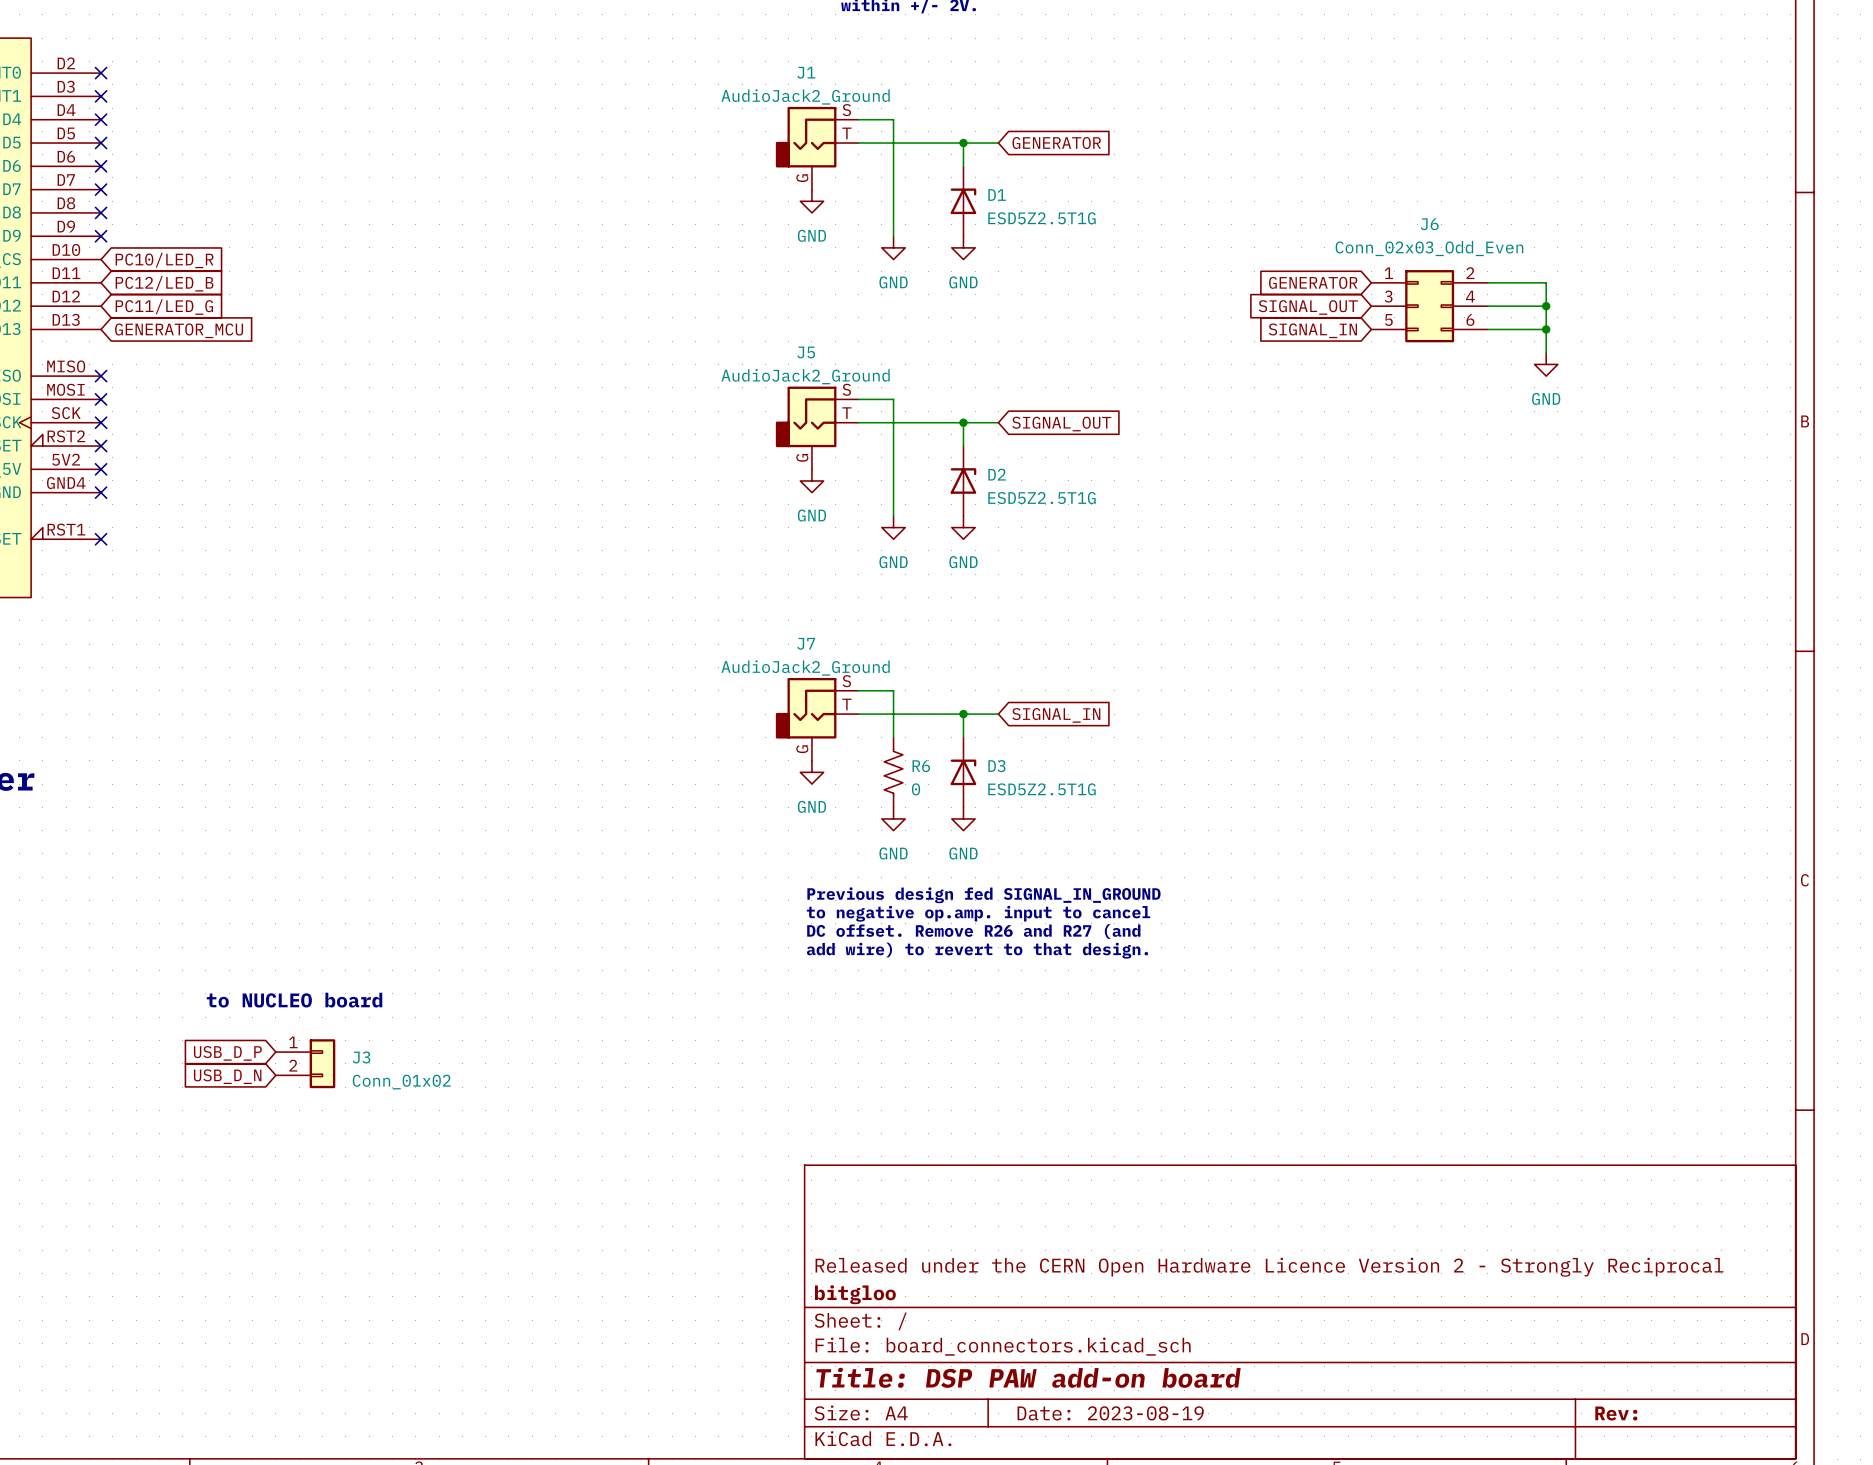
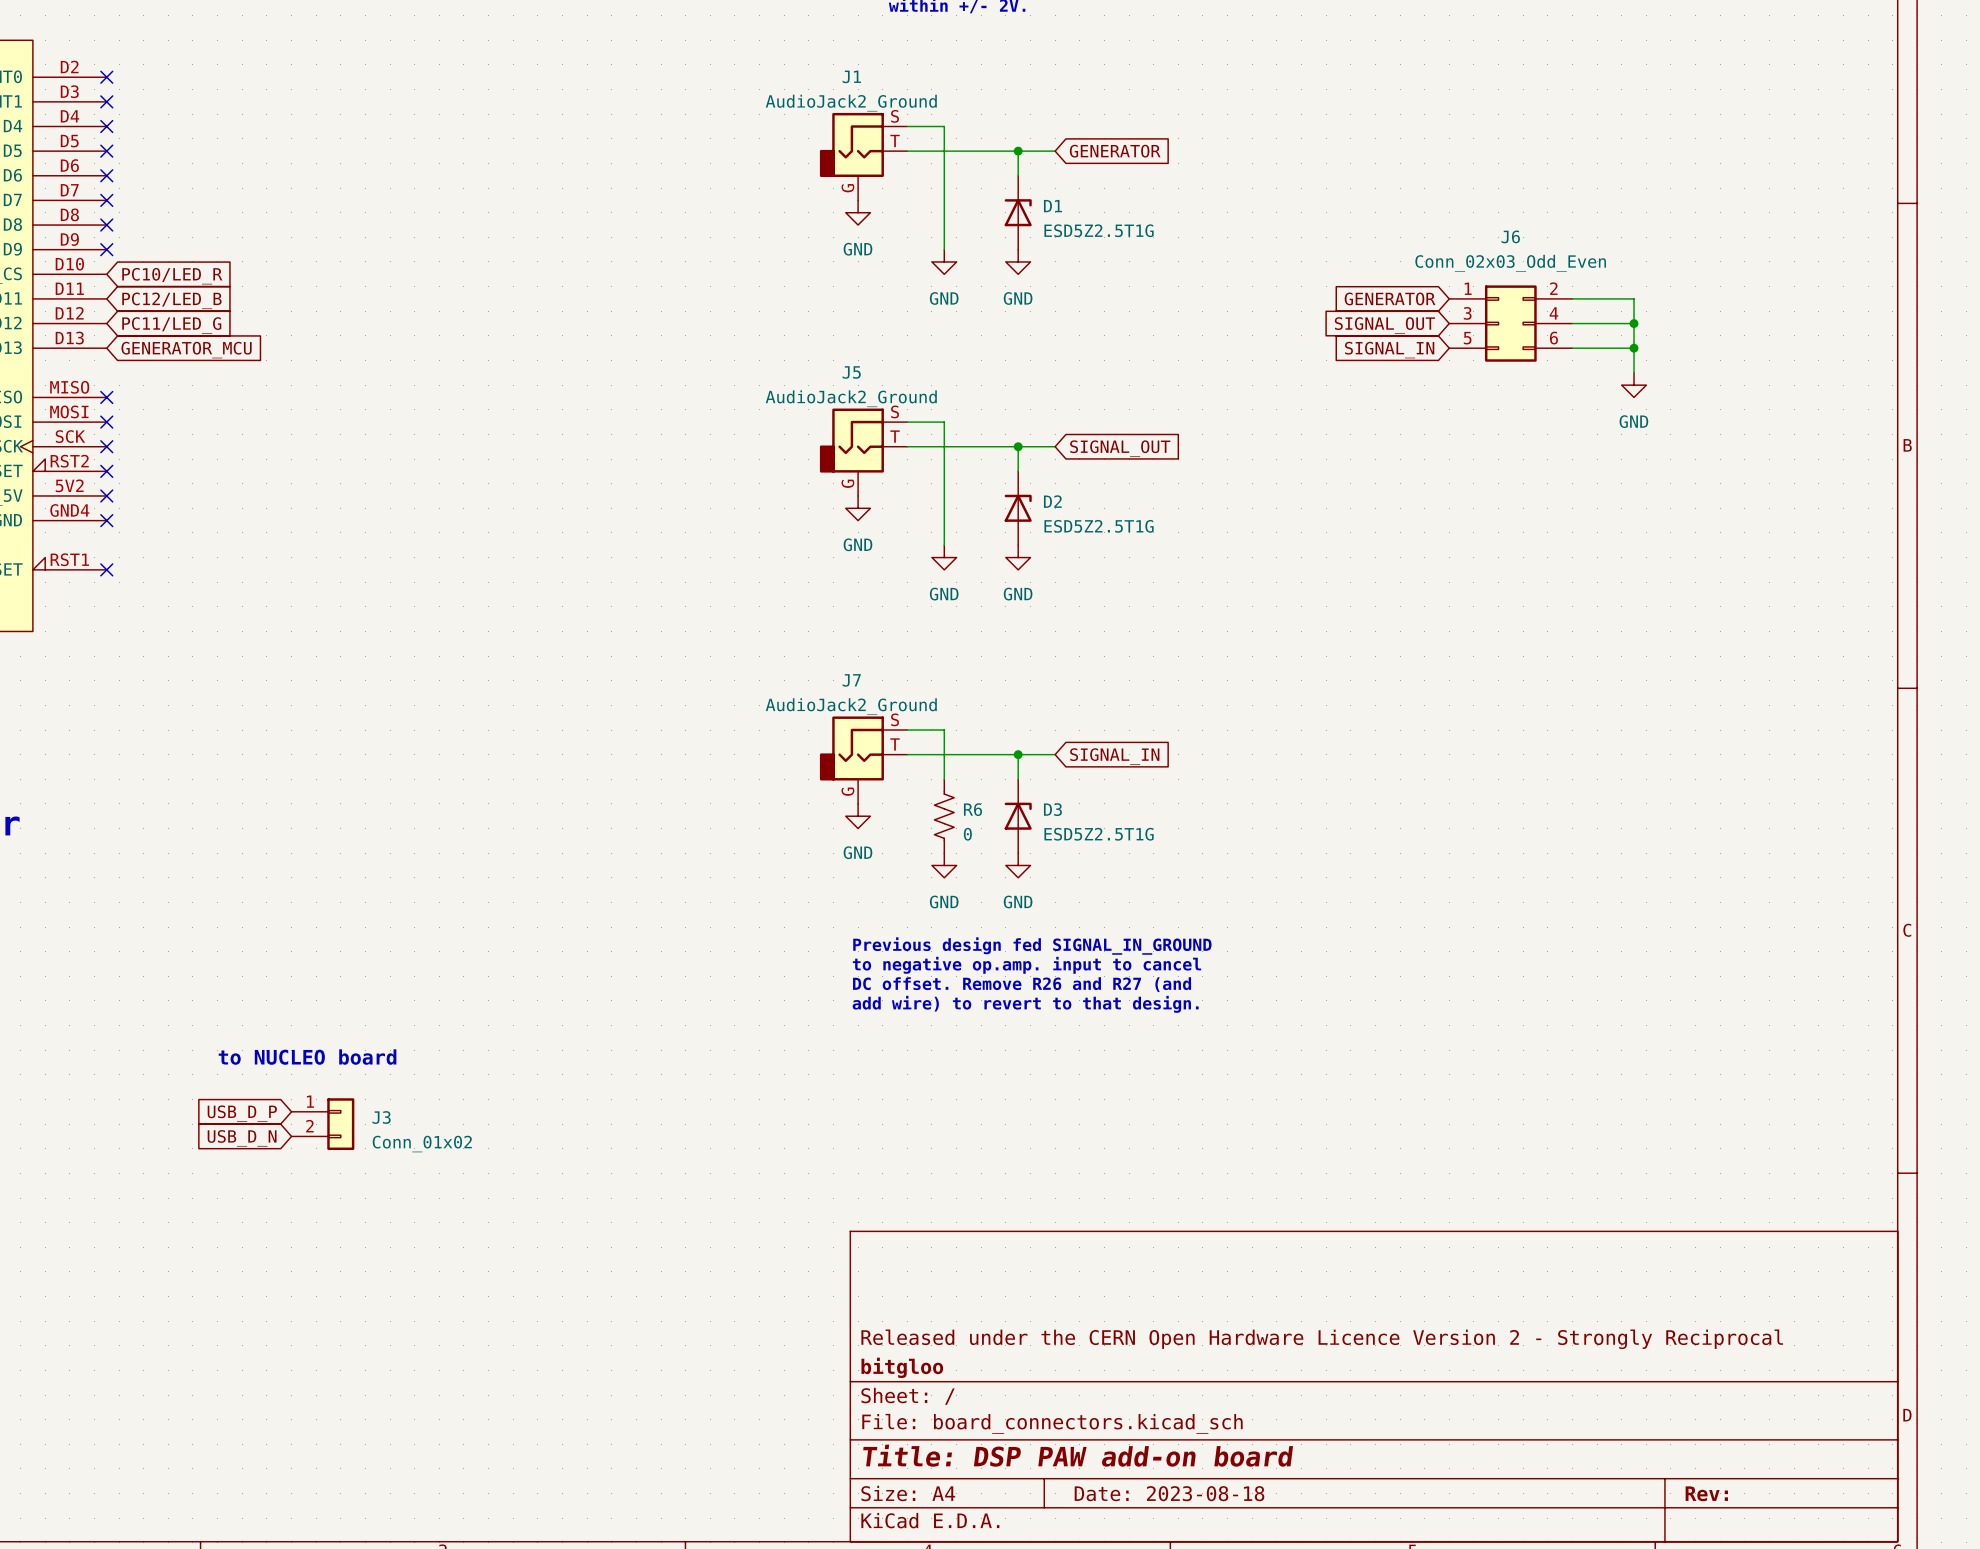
title block: Date: 2023-08-19 (1110, 1413) -> Date: 2023-08-18 (1169, 1493)

